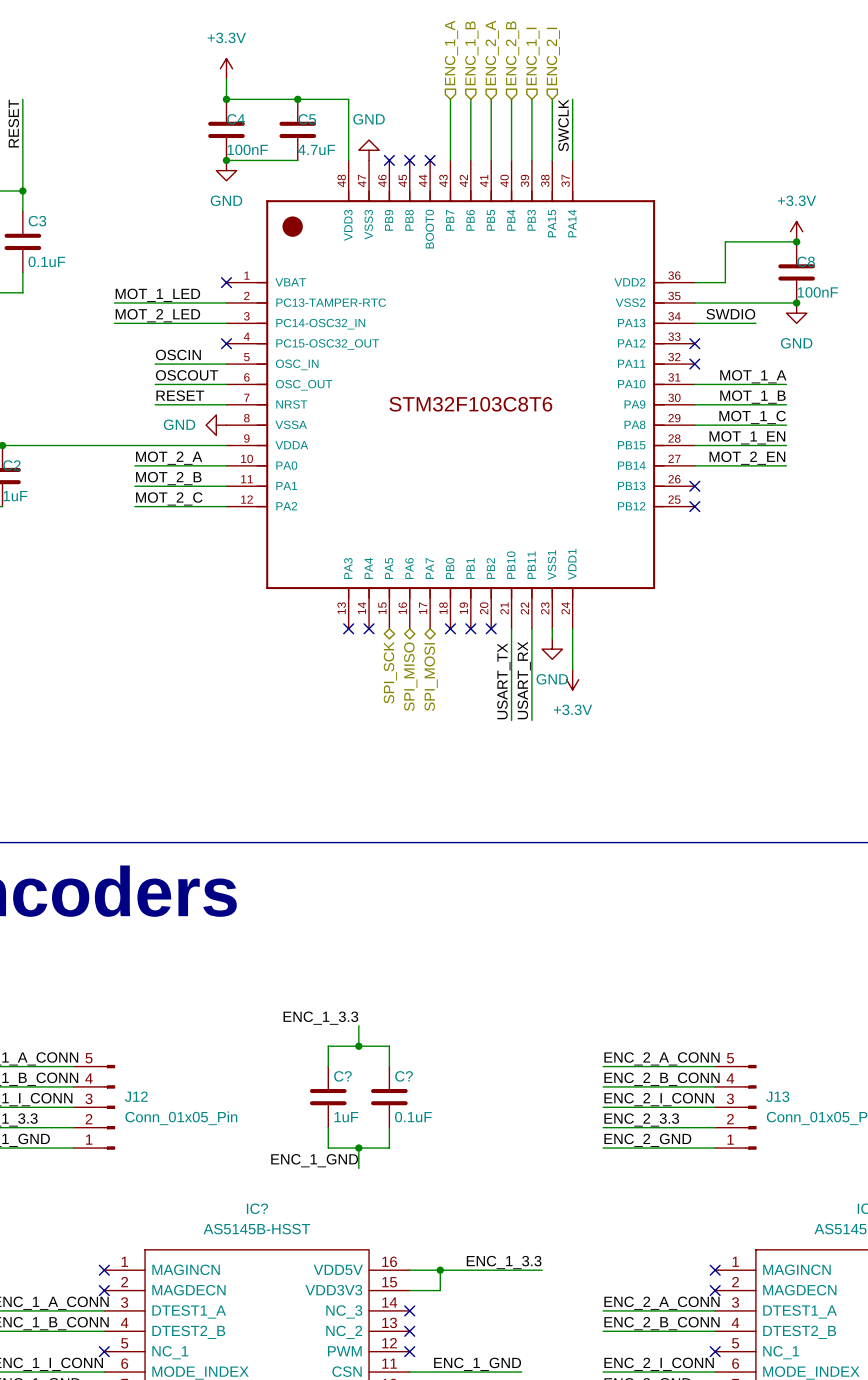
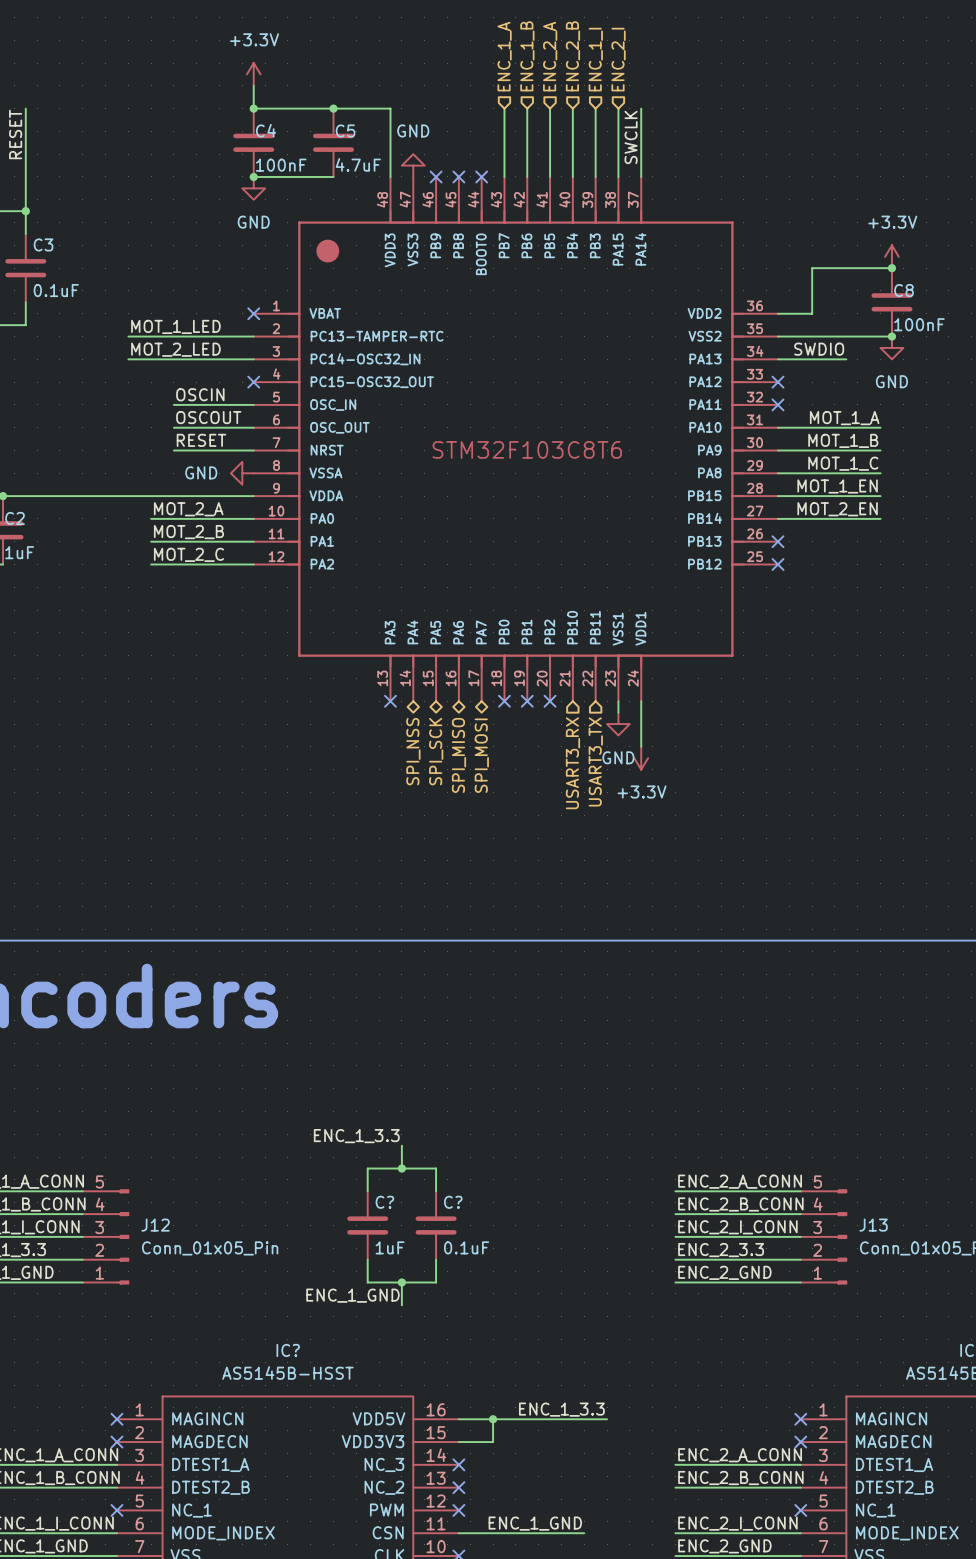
no-connect mark: (369, 628) -> none
wire: (511, 628) (511, 720) -> none
wire: (531, 628) (531, 720) -> none
hierarchical label: none -> SPI_NSS (413, 751)
label: USART_RX (524, 680) -> none
label: USART_TX (503, 681) -> none
hierarchical label: none -> USART3_RX (572, 763)
hierarchical label: none -> USART3_TX (595, 761)

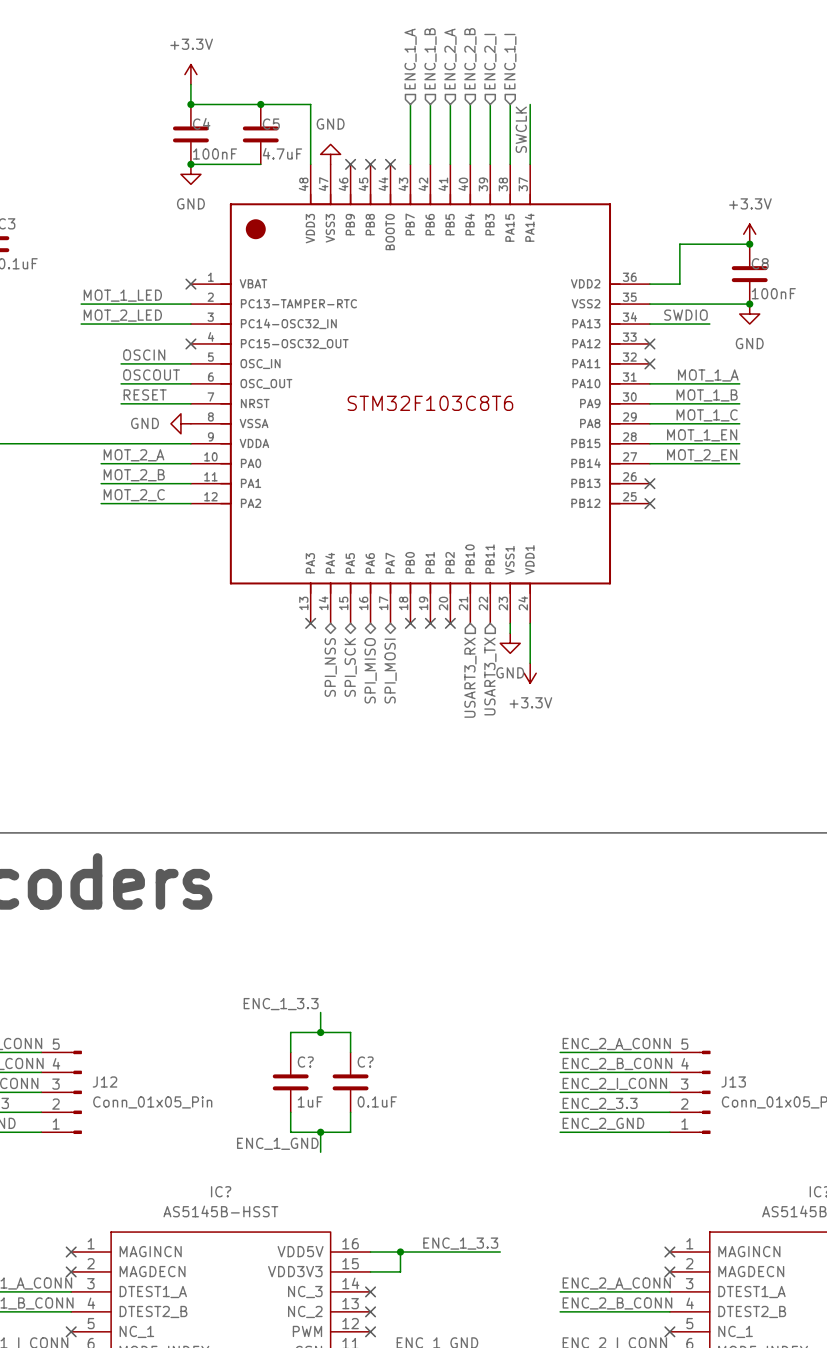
hierarchical label: ENC_1_I (595, 59) -> ENC_2_I (490, 61)
hierarchical label: ENC_2_I (618, 59) -> ENC_1_I (510, 61)

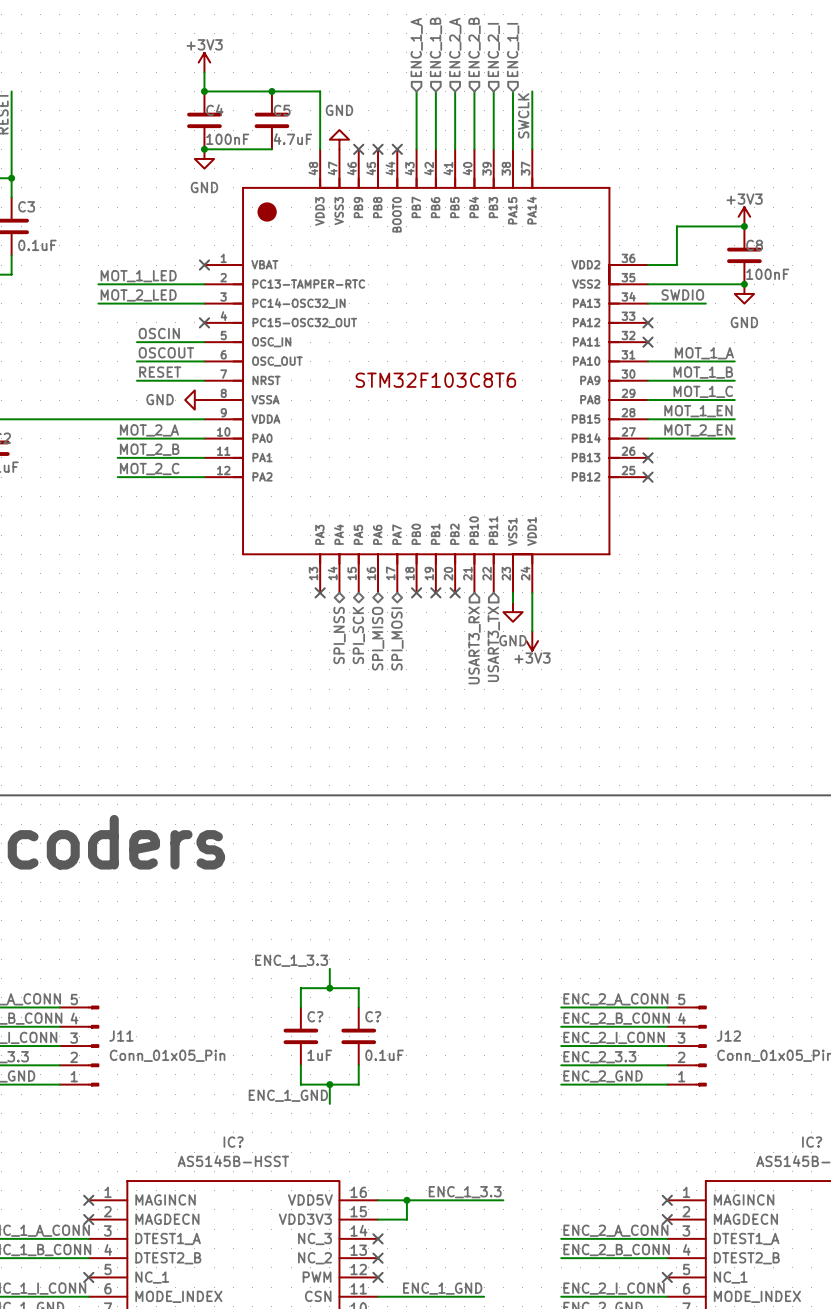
power symbol: +3.3V (190, 74) -> +3V3 (204, 62)
power symbol: +3.3V (749, 234) -> +3V3 (744, 216)
power symbol: +3.3V (530, 673) -> +3V3 (532, 641)
J12 name: J12 (105, 1081) -> J11 (121, 1036)
J13 name: J13 (733, 1081) -> J12 (728, 1036)

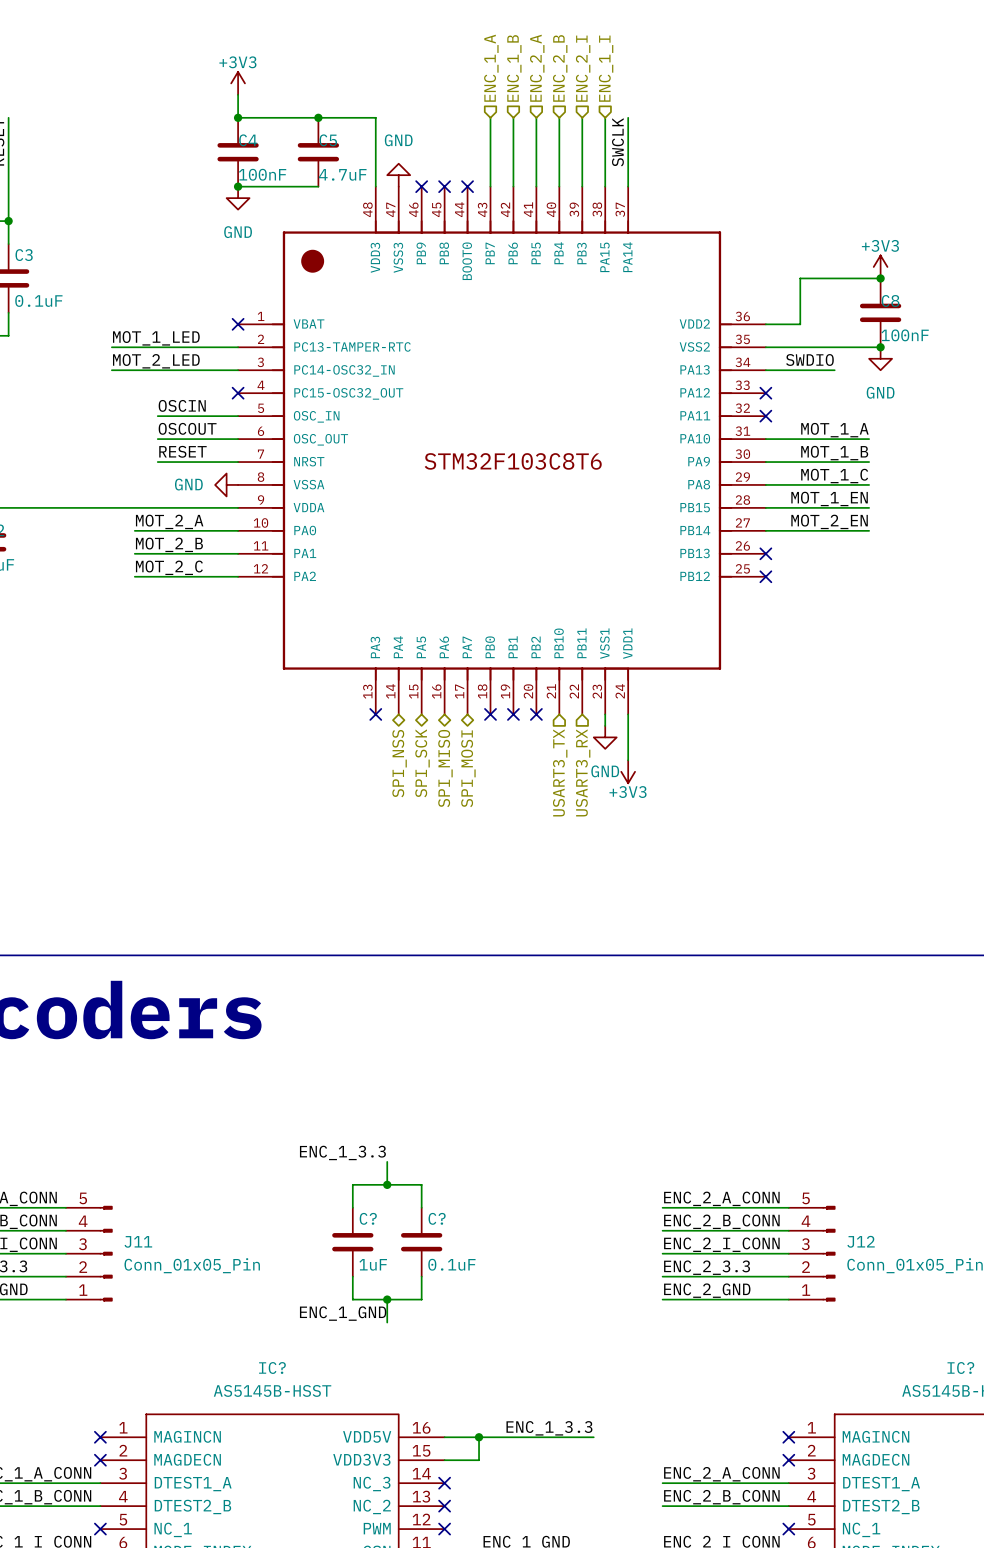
hierarchical label: USART3_TX (493, 644) -> USART3_RX (583, 772)
hierarchical label: USART3_RX (474, 645) -> USART3_TX (560, 772)

